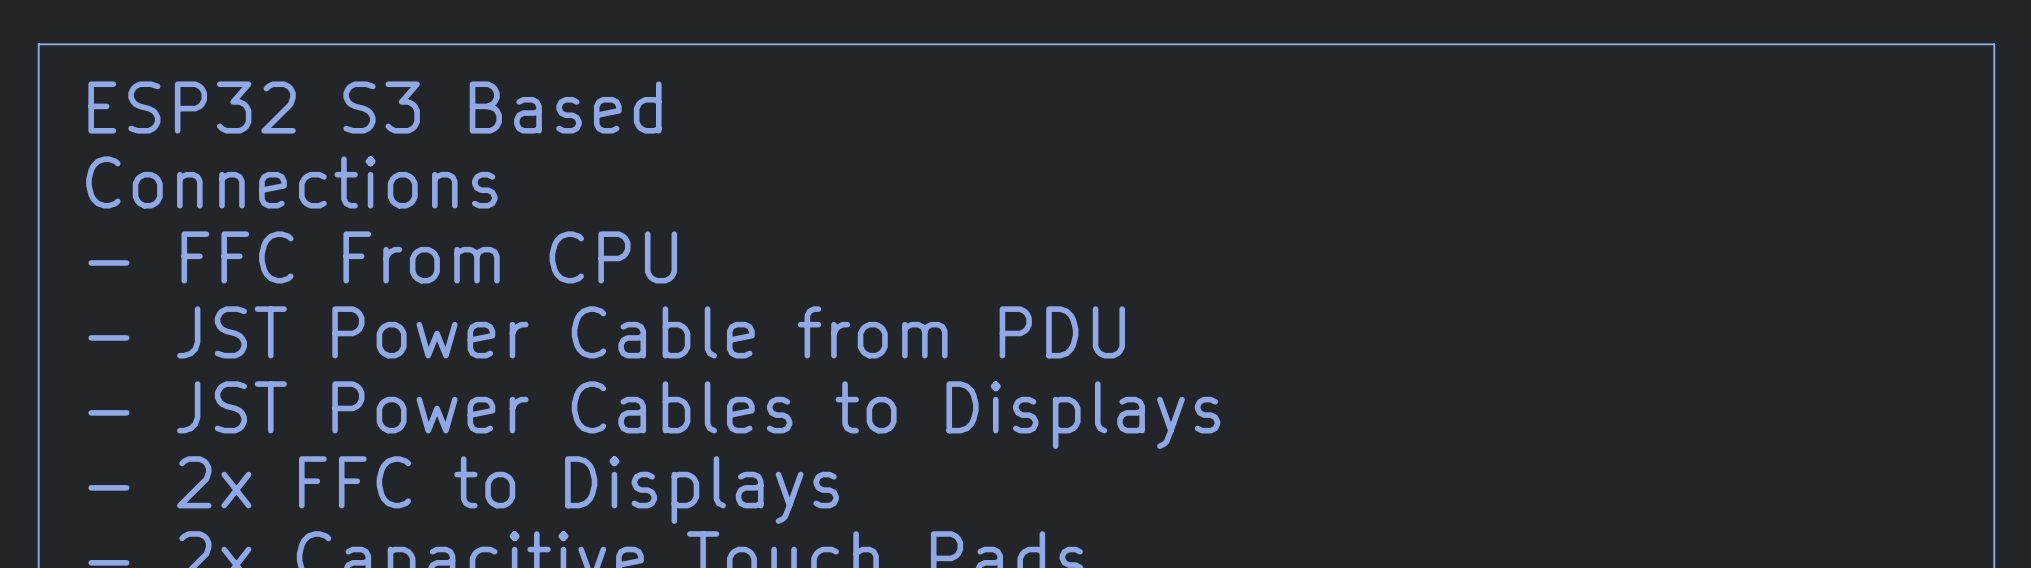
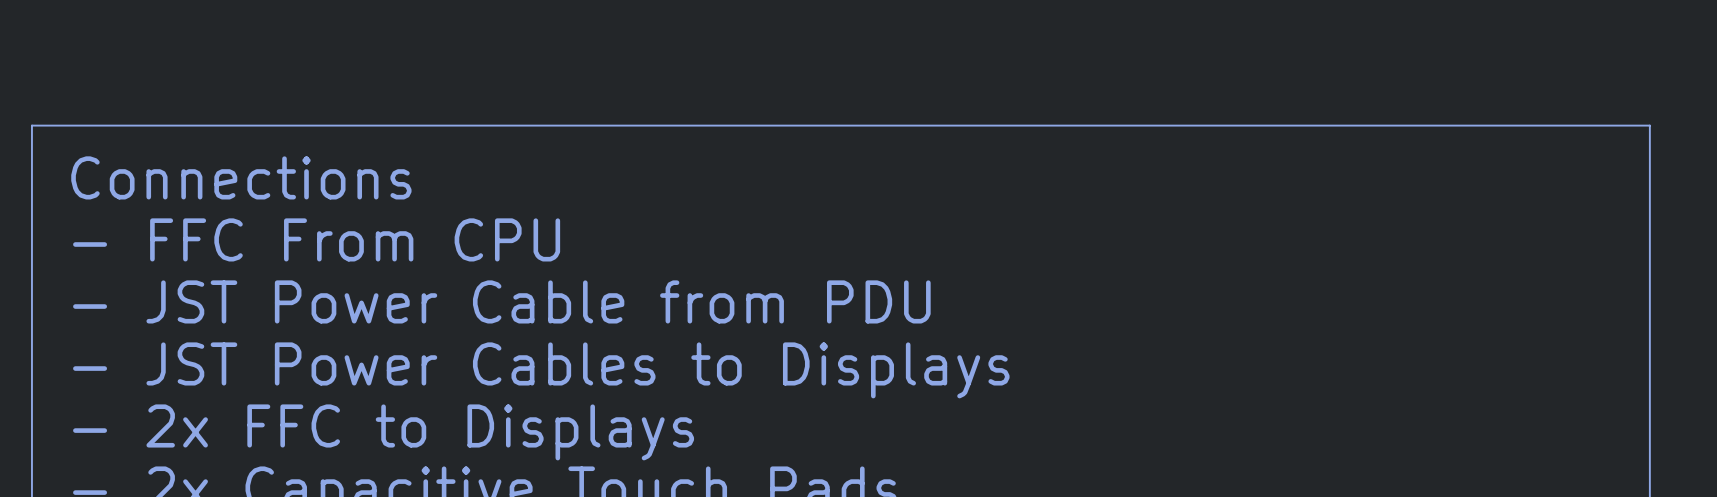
text: ESP32 S3 Based (374, 107) -> none
line: (38, 119) (38, 44) (1994, 44) (1994, 119) -> (31, 125) (1649, 125)

